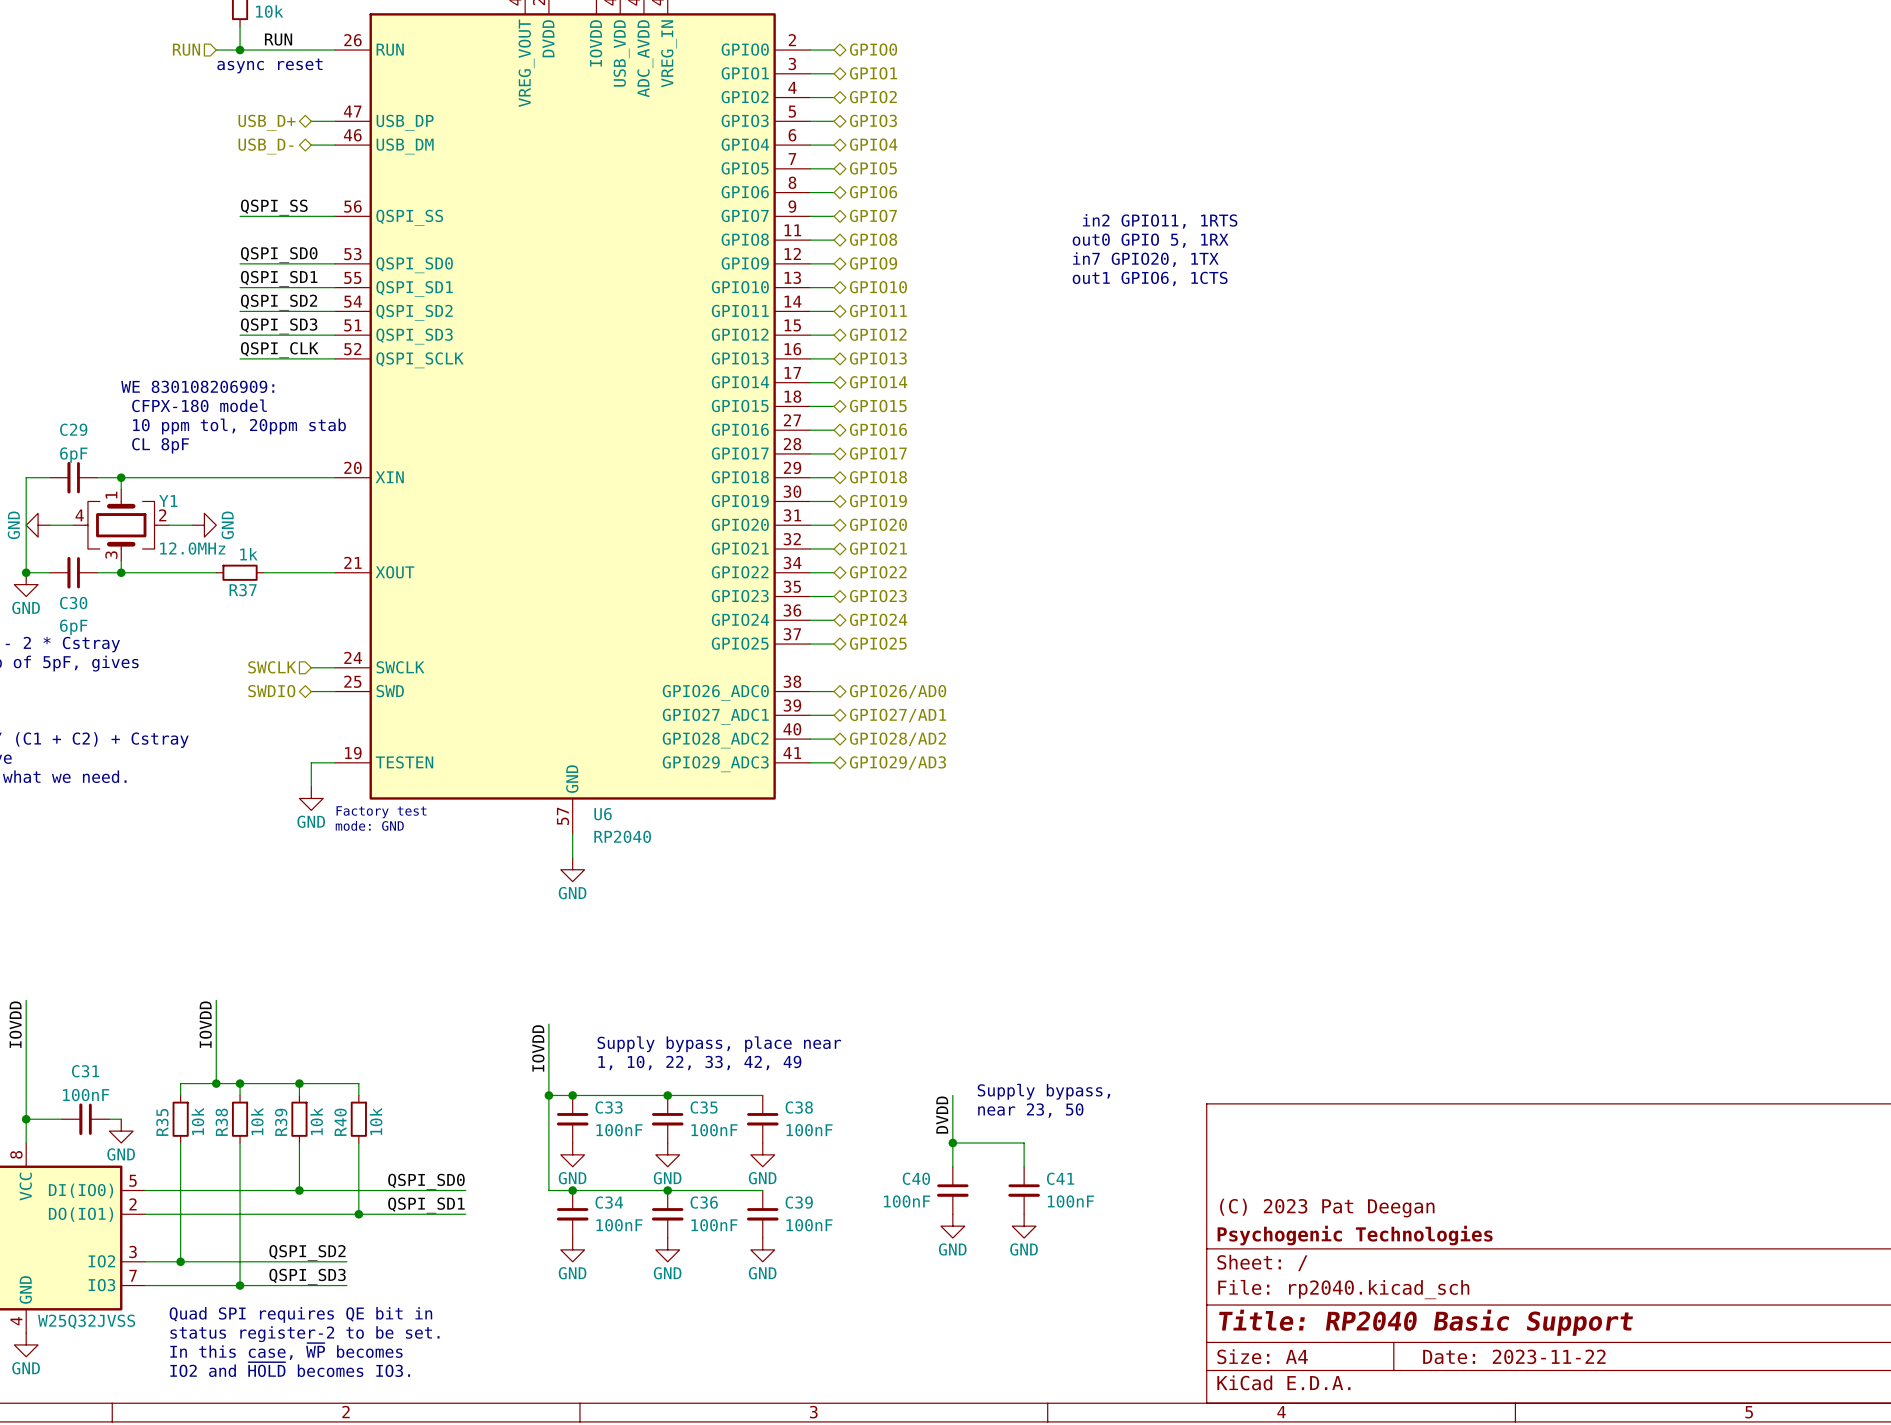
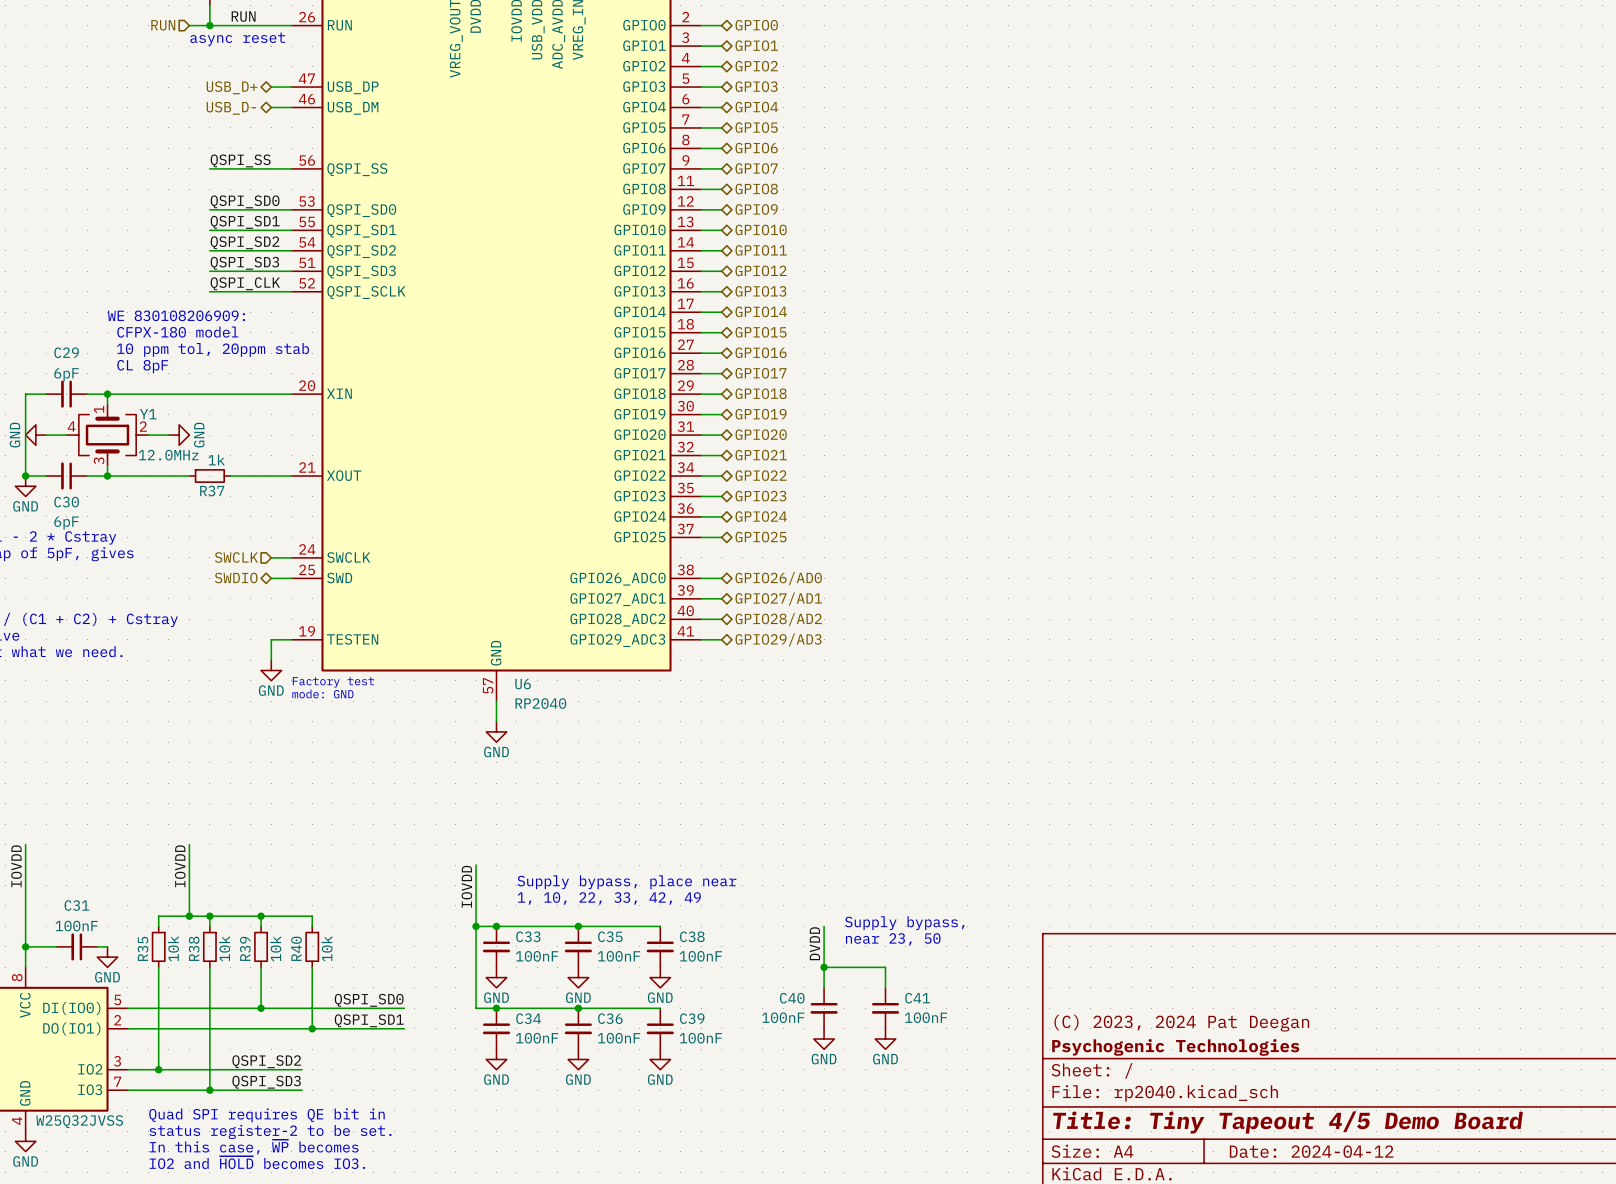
text: in2 GPIO11, 1RTS (1160, 221) -> none
text: out0 GPIO 5, 1RX (1150, 240) -> none
text: in7 GPIO20, 1TX (1145, 259) -> none
text: out1 GPIO6, 1CTS (1150, 278) -> none
title block: (C) 2023 Pat Deegan (1327, 1208) -> (C) 2023, 2024 Pat Deegan (1181, 1023)
title block: Title: RP2040 Basic Support (1426, 1322) -> Title: Tiny Tapeout 4/5 Demo Board (1287, 1122)
title block: Date: 2023-11-22 (1514, 1356) -> Date: 2024-04-12 (1311, 1151)

